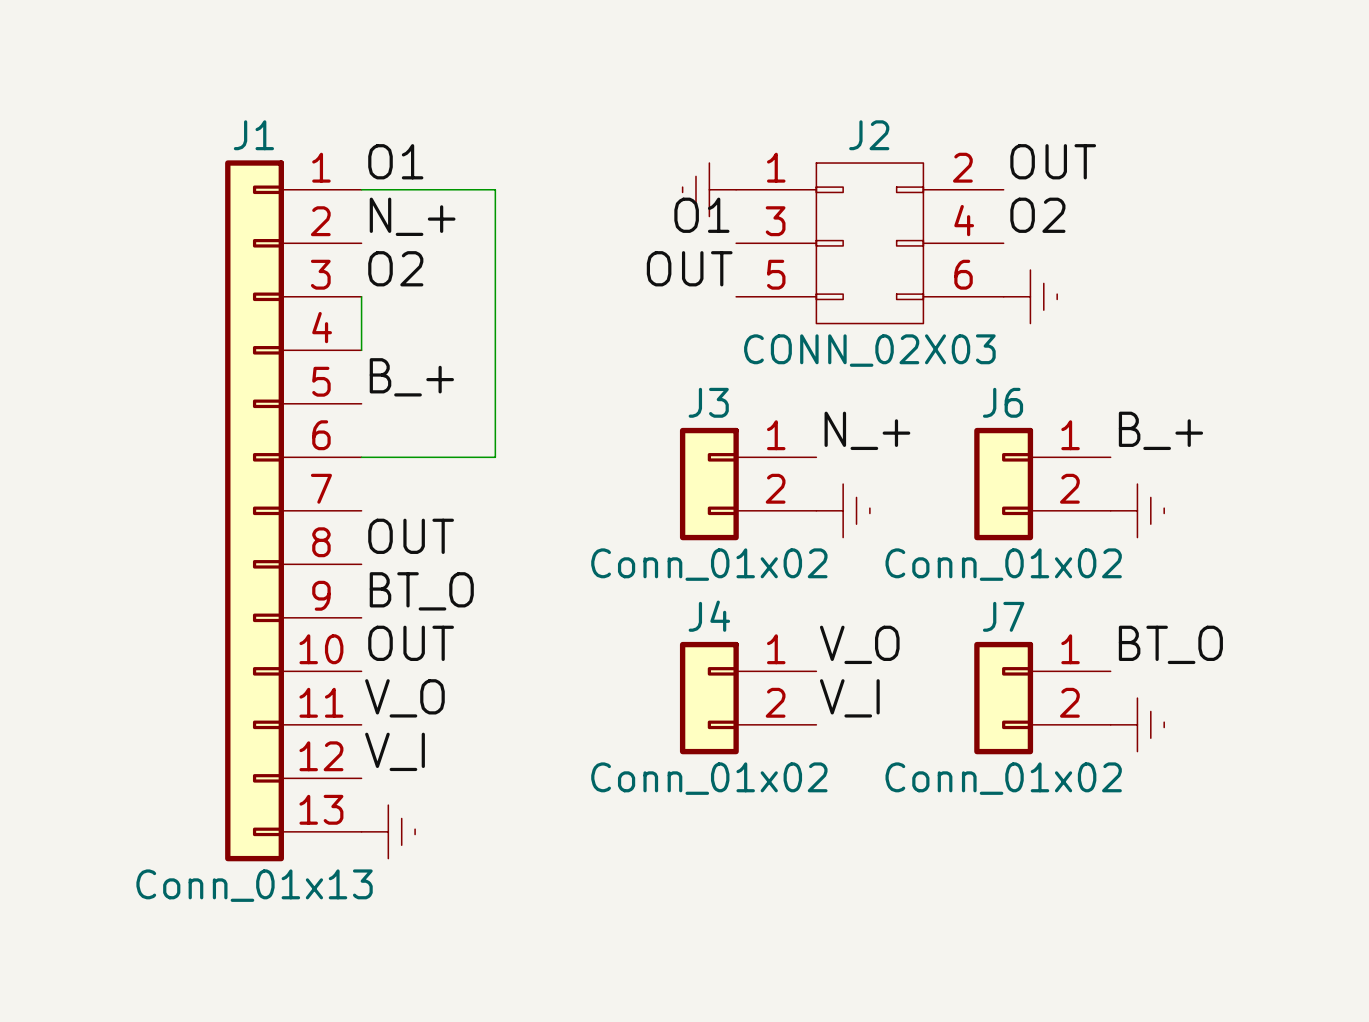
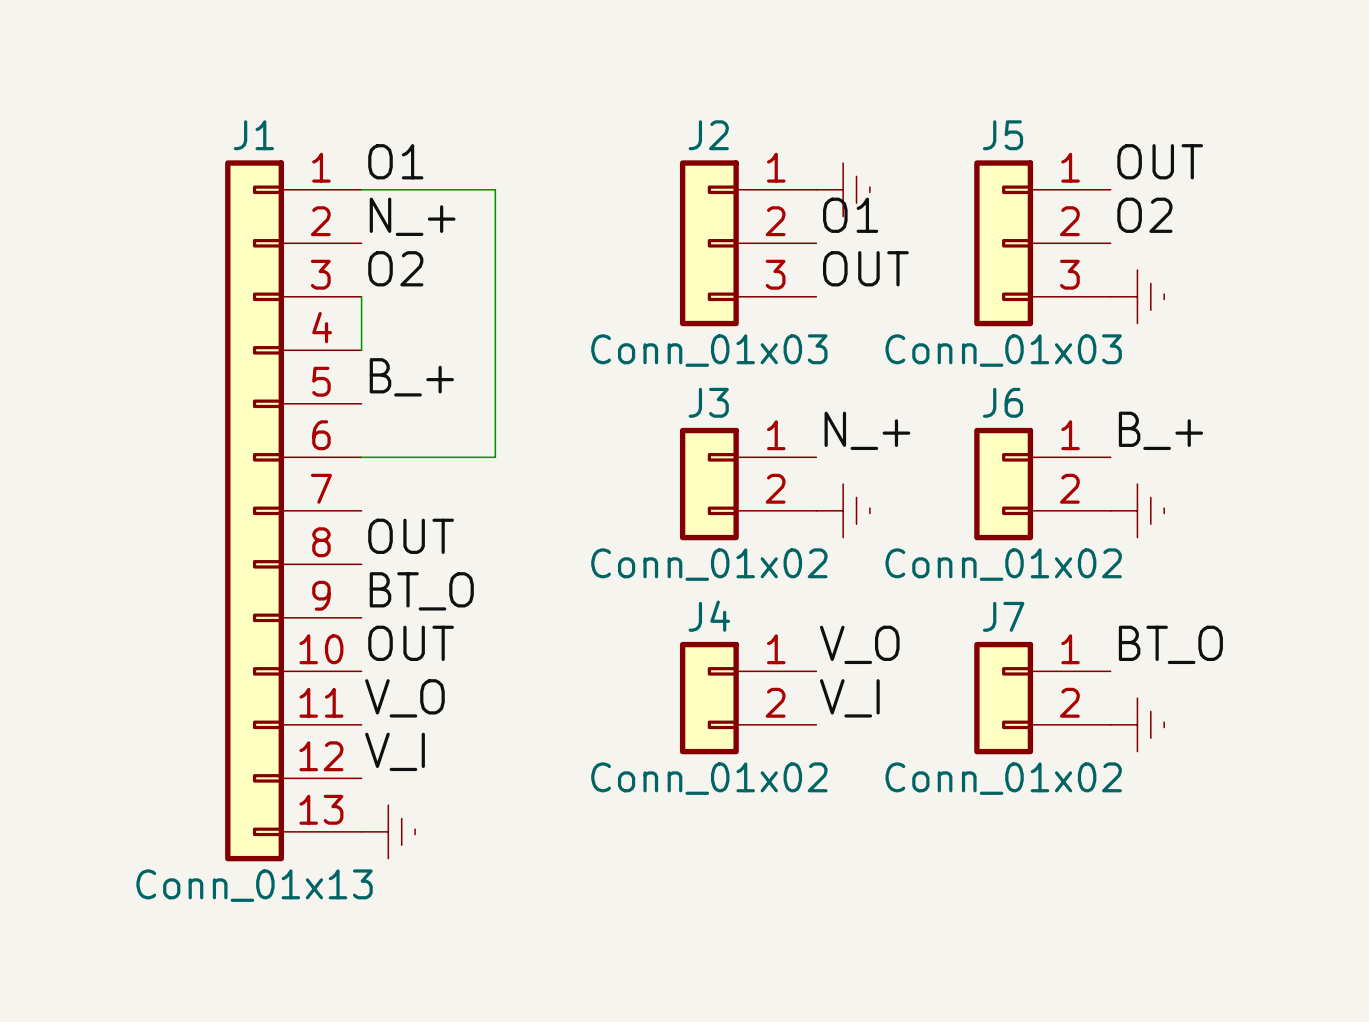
label position: OUT (1053, 161) -> OUT (1160, 161)
J2 symbol: [736, 163, 1004, 324] -> [679, 160, 817, 327]
power symbol: (709, 189) -> none
power symbol: none -> (843, 189)
label position: O1 (701, 215) -> O1 (850, 215)
label position: O2 (1037, 215) -> O2 (1144, 215)
J5: none -> Conn_01x03 (1042, 243)
label position: OUT (689, 268) -> OUT (865, 268)
power symbol position: (1030, 296) -> (1137, 296)
J2 value: CONN_02X03 (869, 350) -> Conn_01x03 (709, 350)

